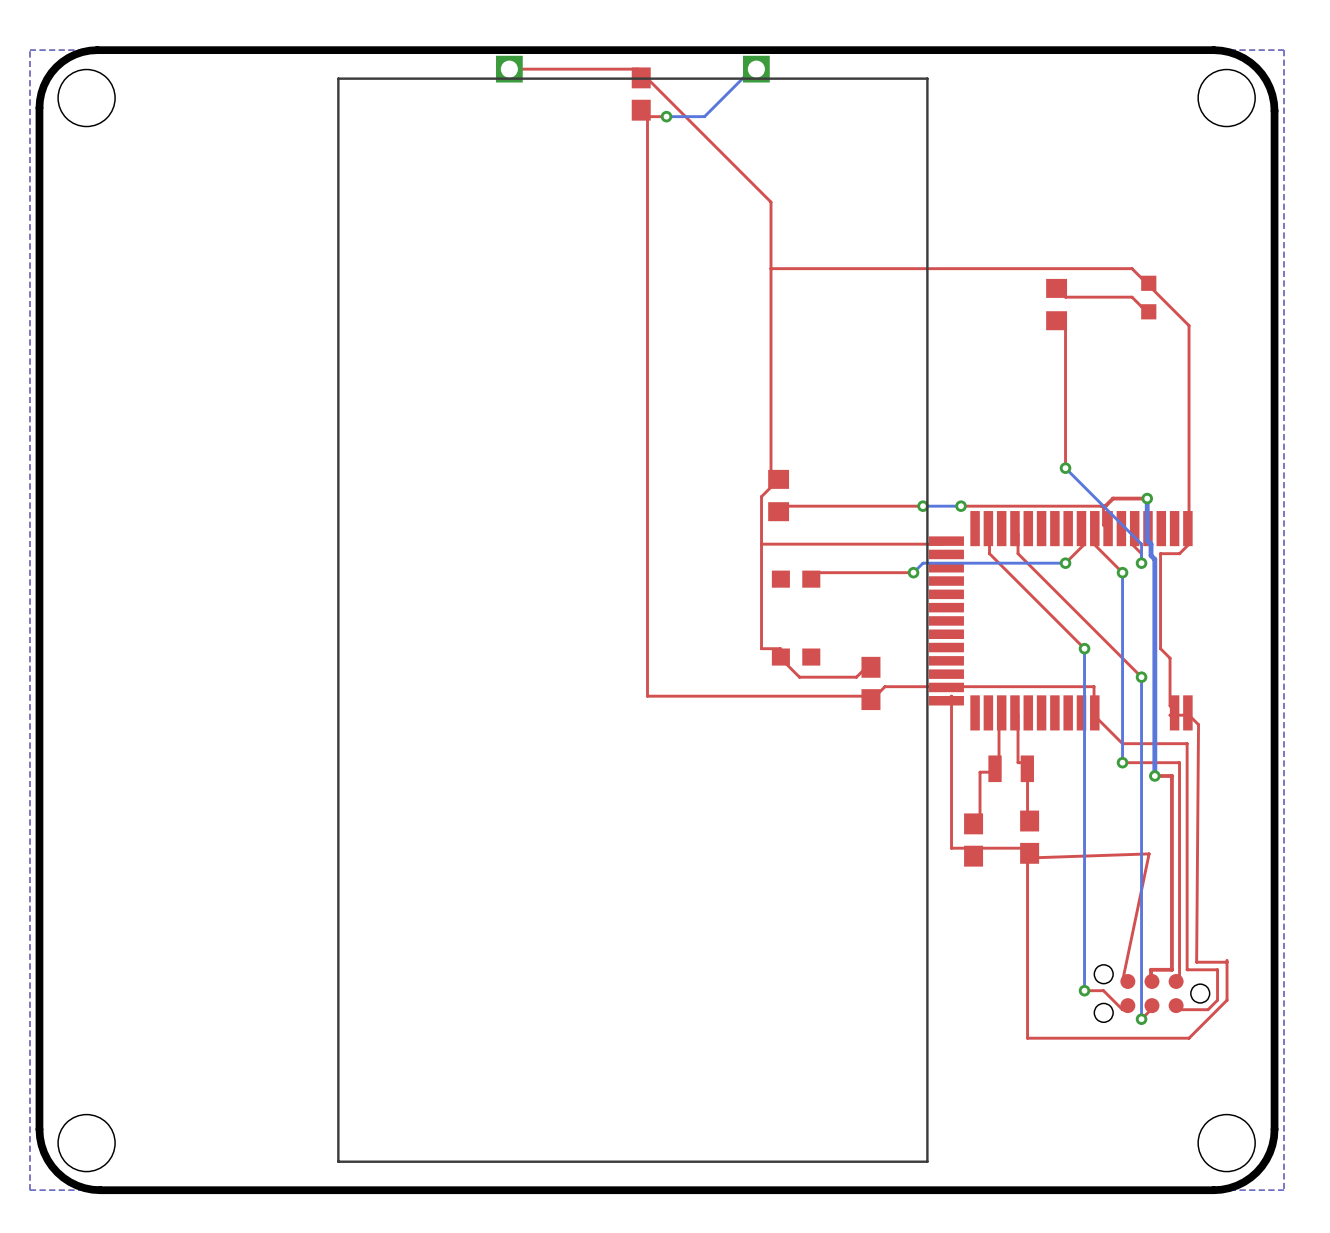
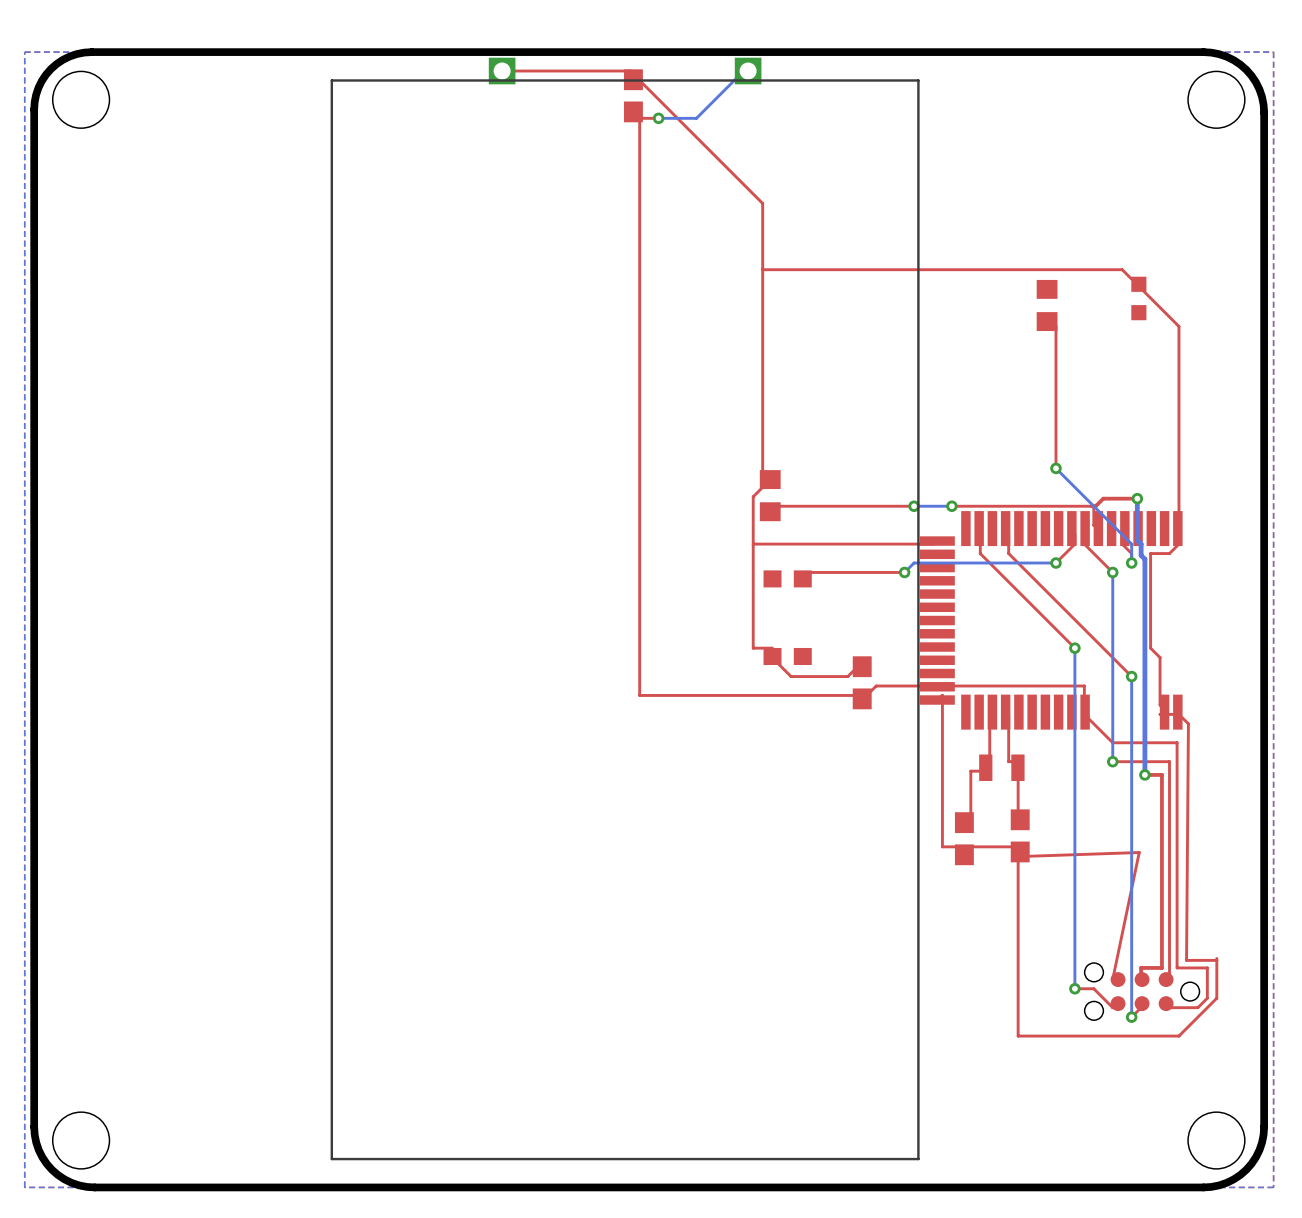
top track: (1056, 288) (1065, 297) (1132, 297) (1148, 311) -> none

